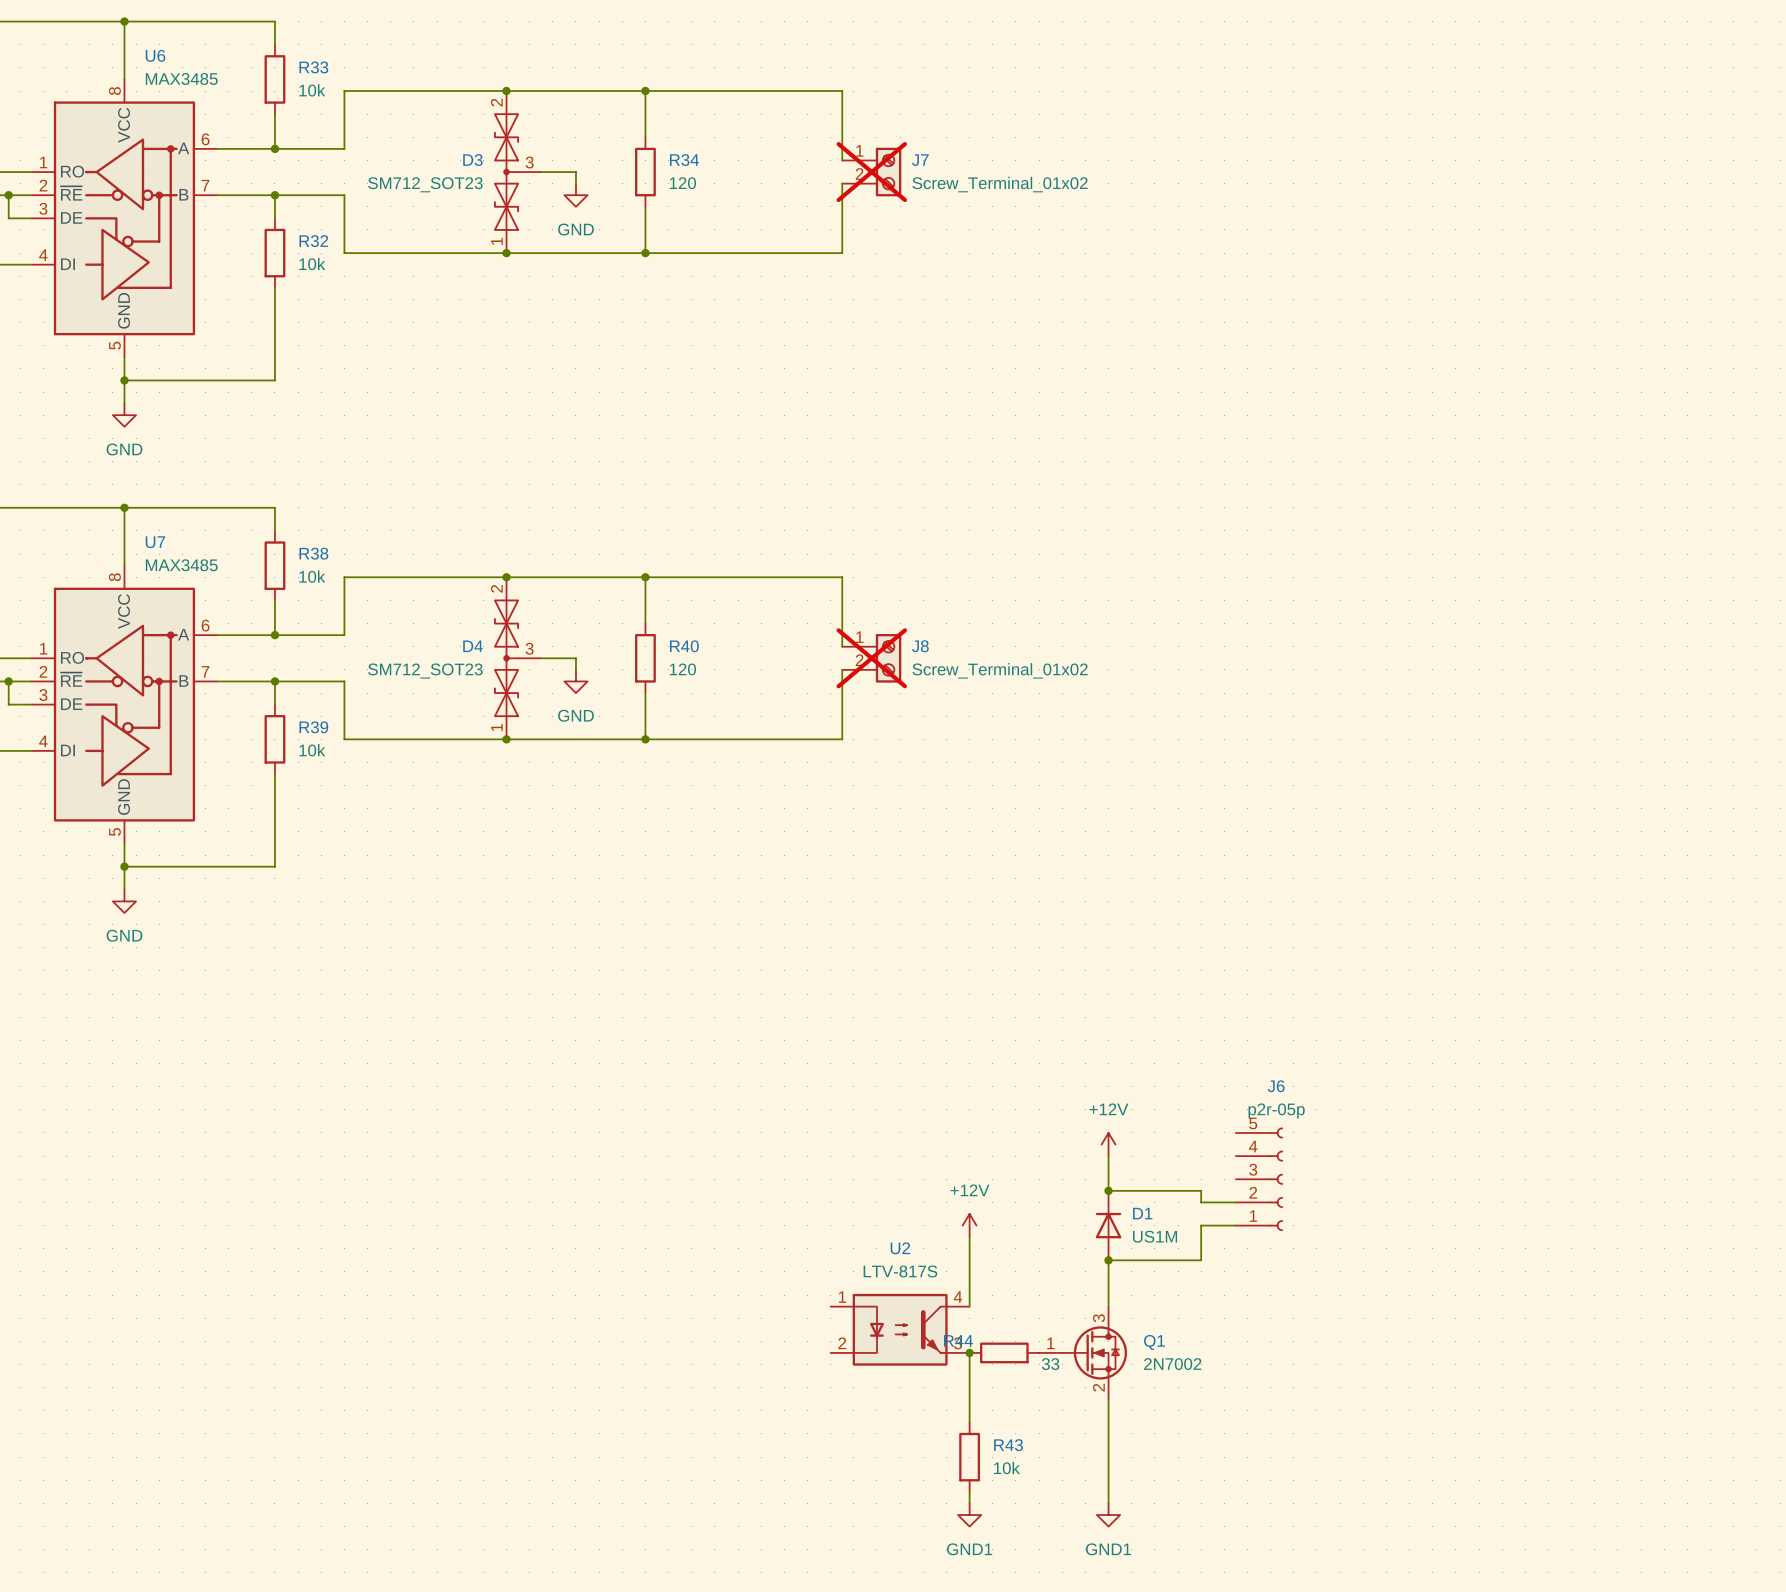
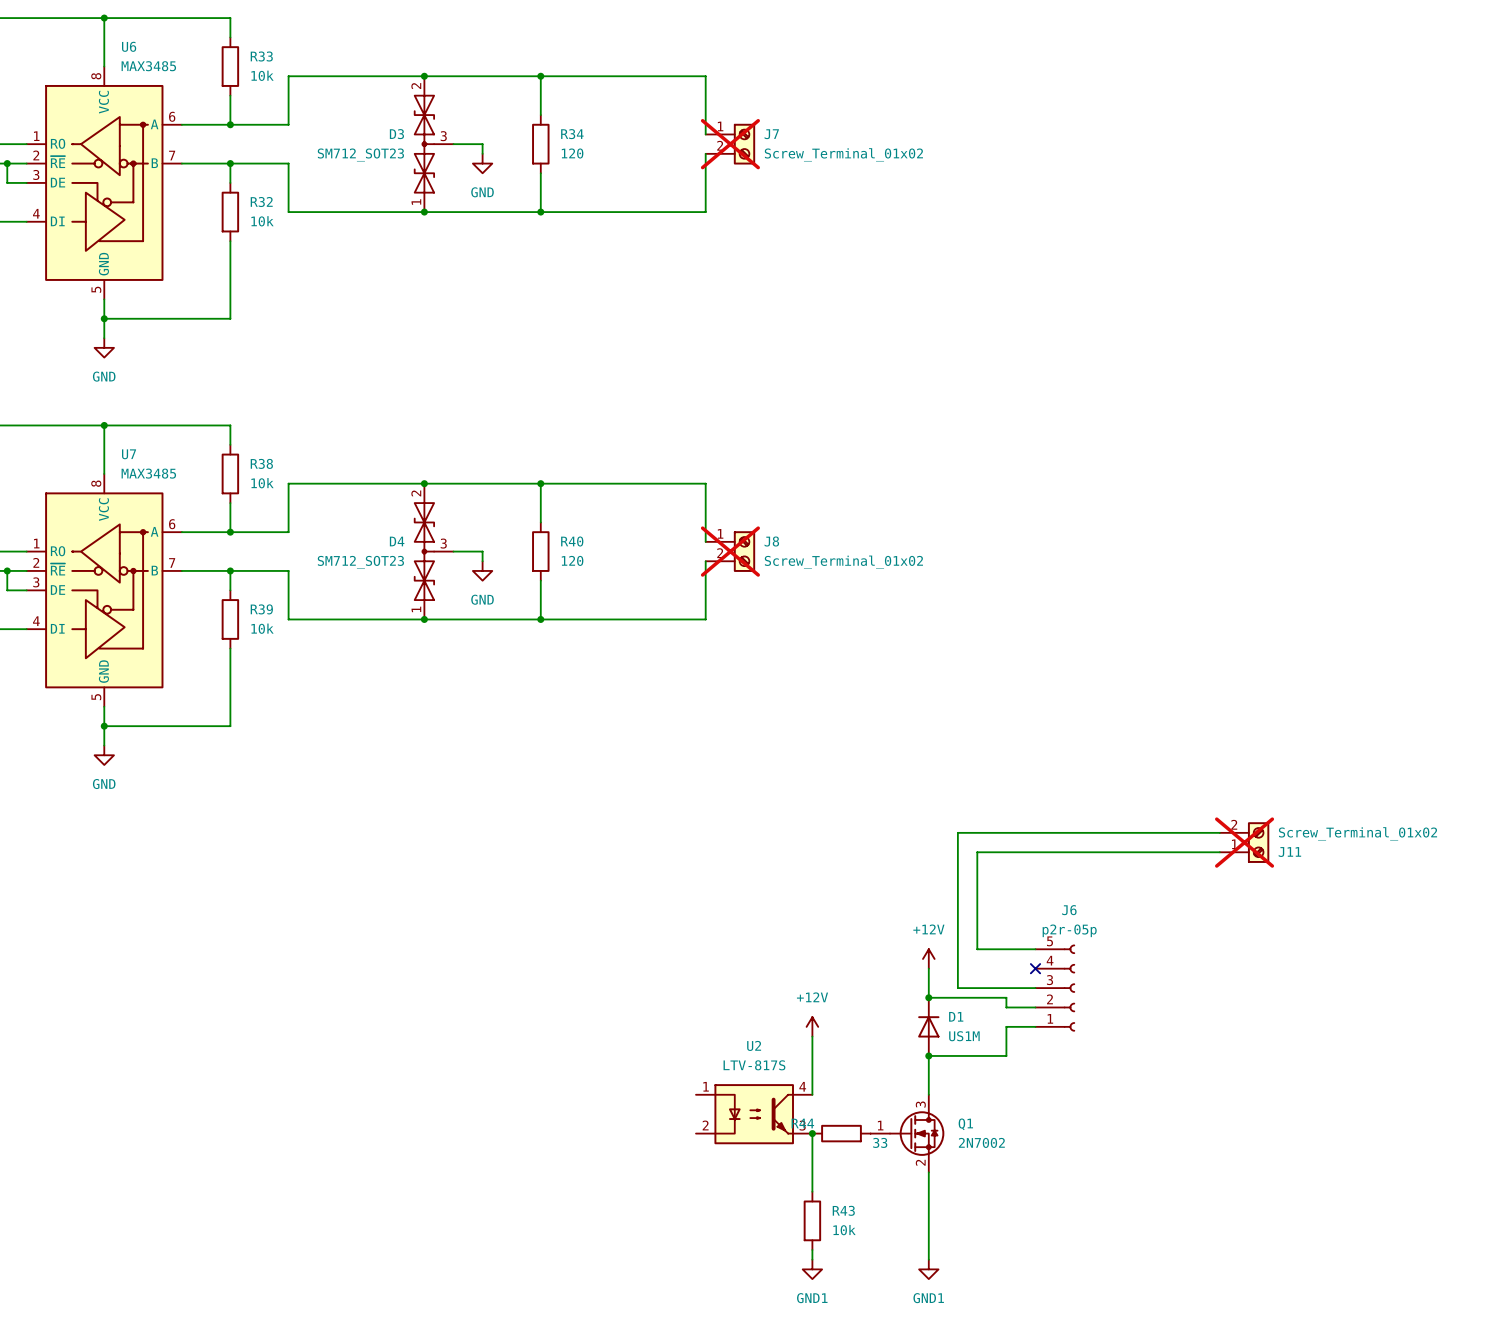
wire: none -> (1219, 832) (957, 832) (957, 988) (1035, 988)
J11: none -> Screw_Terminal_01x02 (1244, 842)
wire: none -> (1219, 852) (977, 852) (977, 949) (1035, 949)
no-connect mark: none -> (1035, 968)

